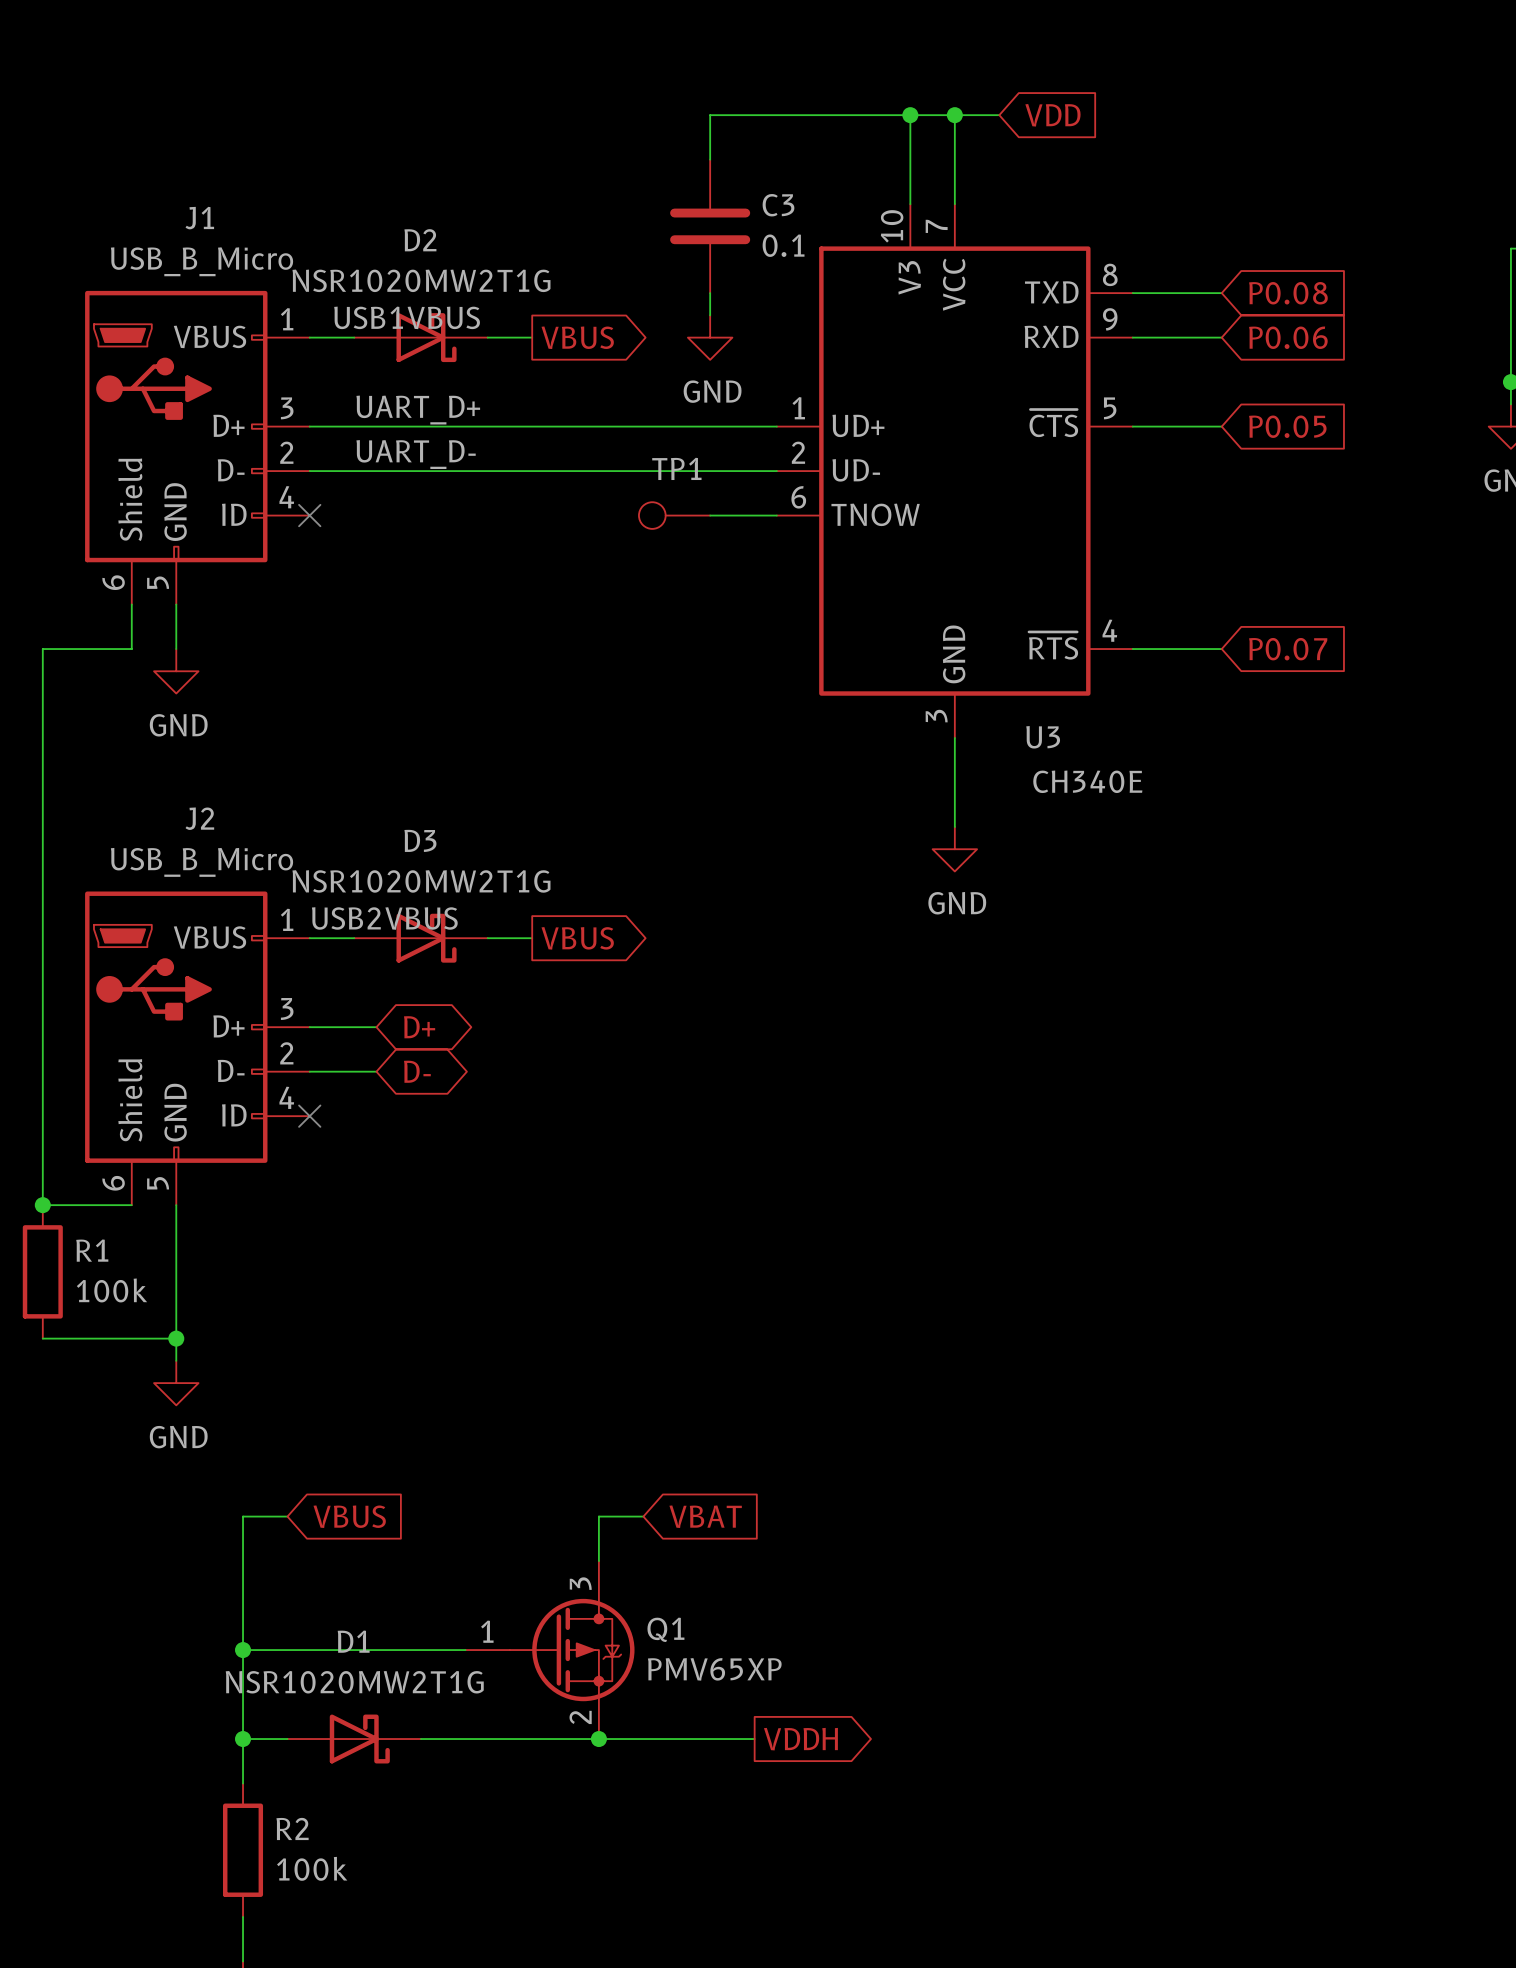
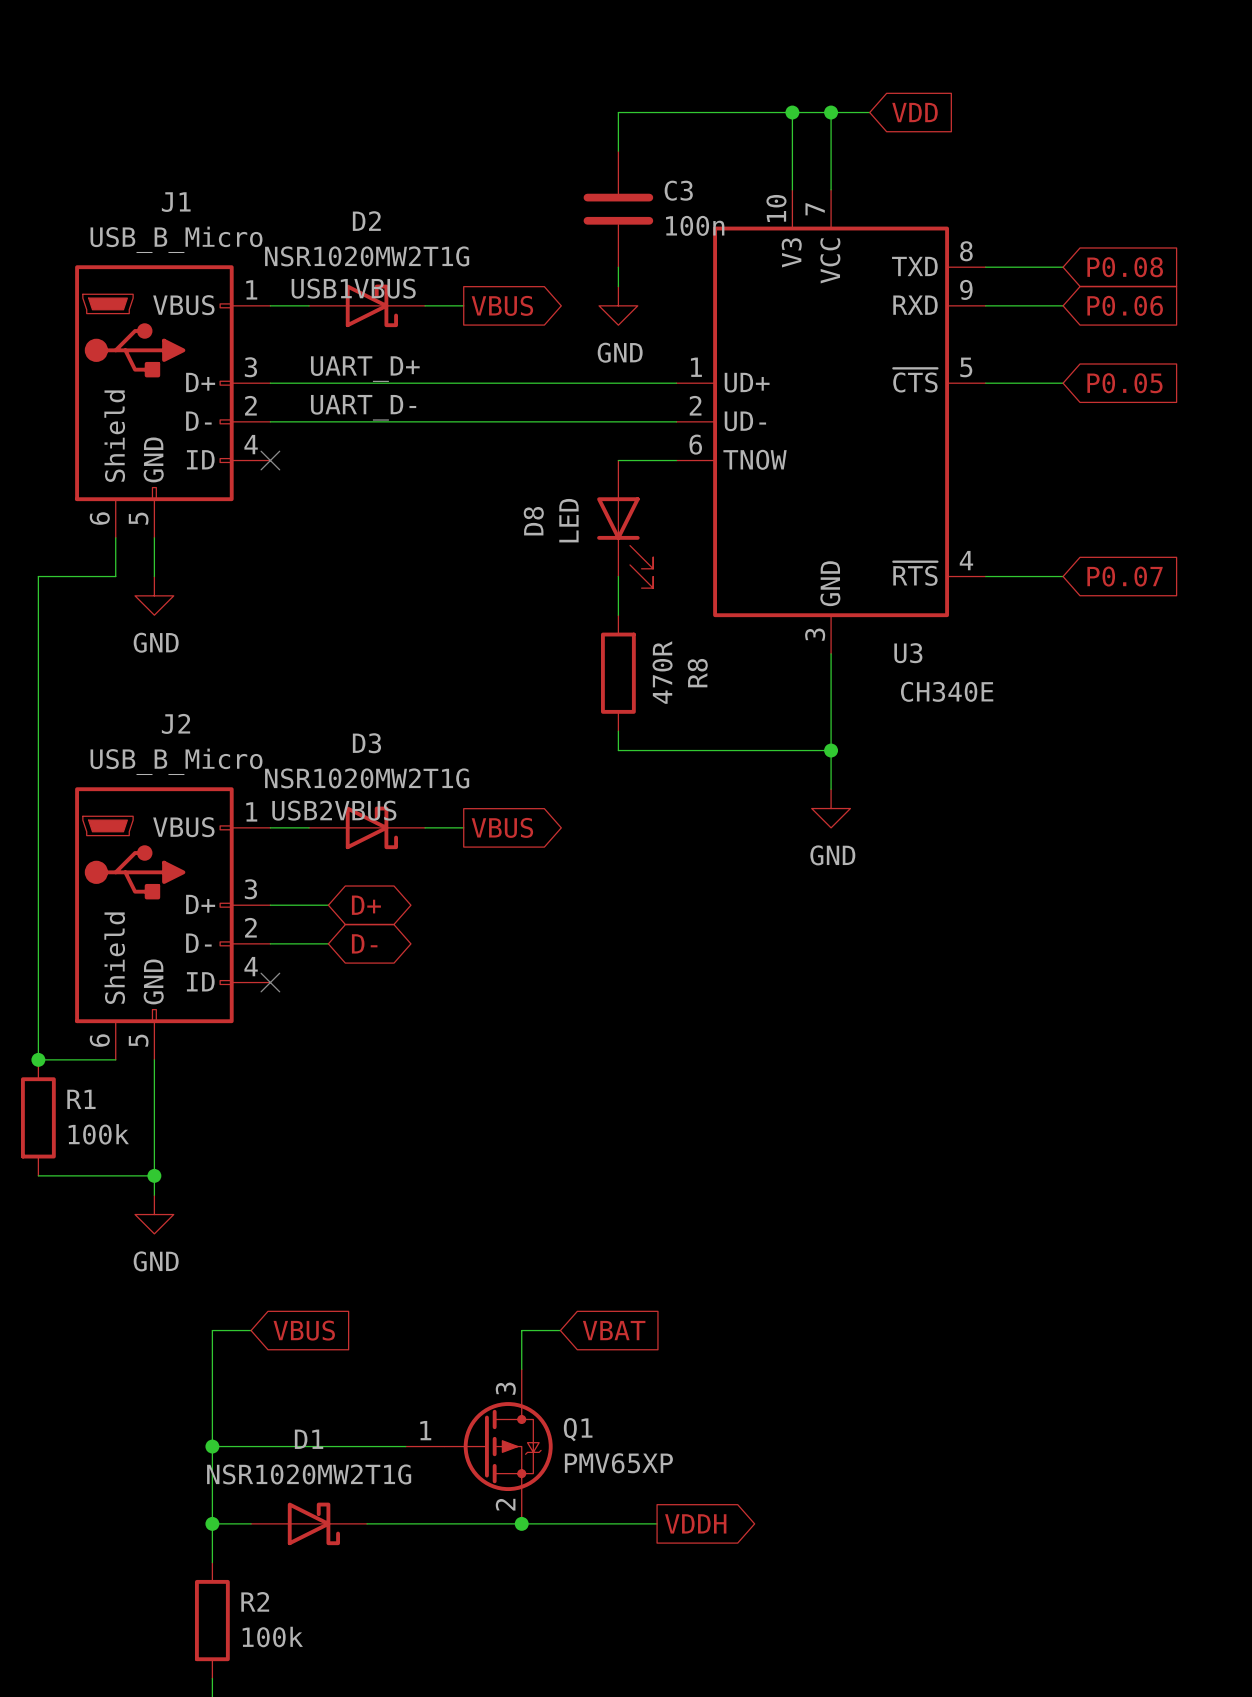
C3 value: 0.1 (783, 245) -> 100n (695, 225)
TP1: (674, 515) -> none
D8: none -> LED (625, 524)
wire: none -> (618, 576) (618, 615)
R8: none -> 470R (618, 673)
wire: none -> (618, 731) (618, 750) (831, 750)
wire: none -> (831, 731) (831, 789)
power symbol position: GND (954, 849) -> GND (831, 808)
junction: none -> (831, 750)

